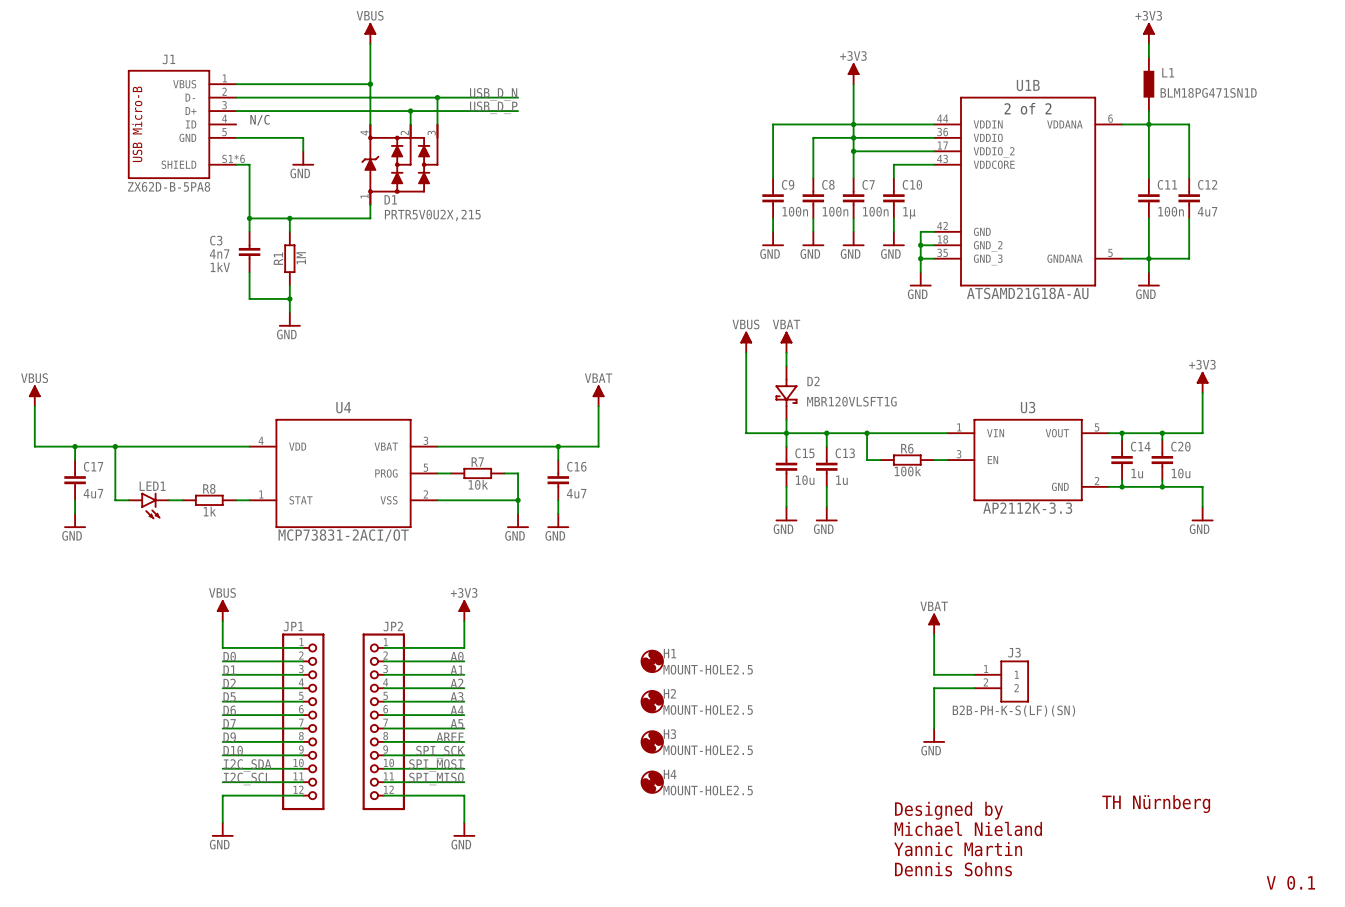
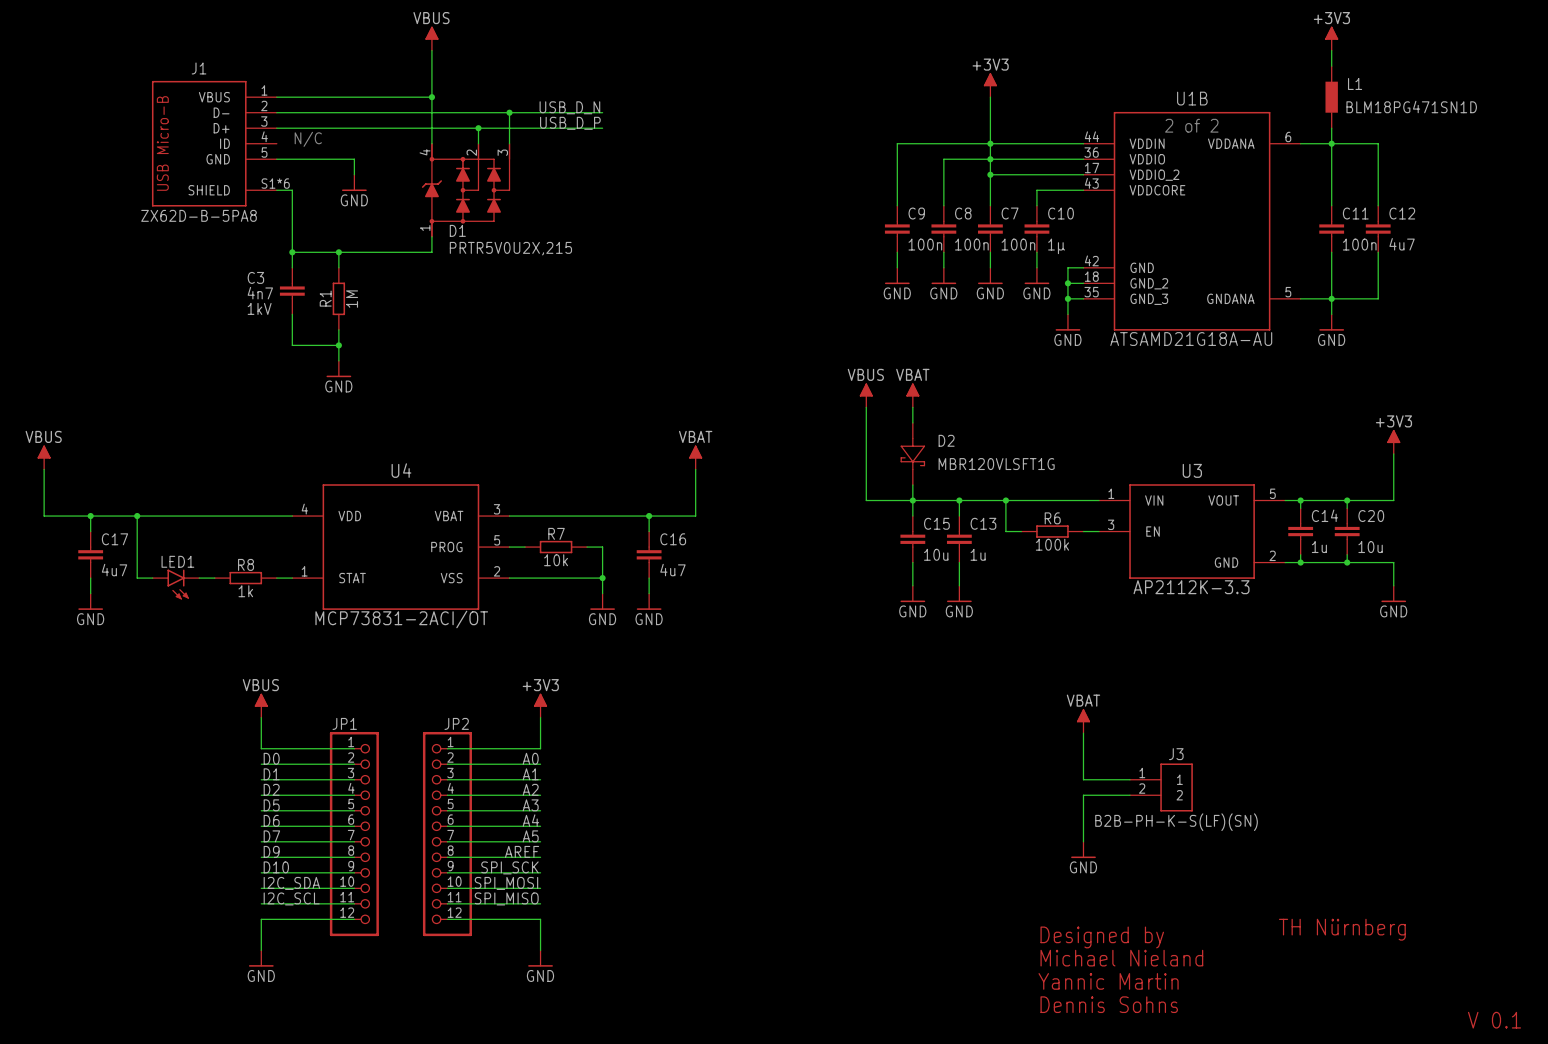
H1: MOUNT-HOLE2.5 (652, 661) -> none
H2: MOUNT-HOLE2.5 (652, 701) -> none
H3: MOUNT-HOLE2.5 (652, 741) -> none
H4: MOUNT-HOLE2.5 (652, 782) -> none

